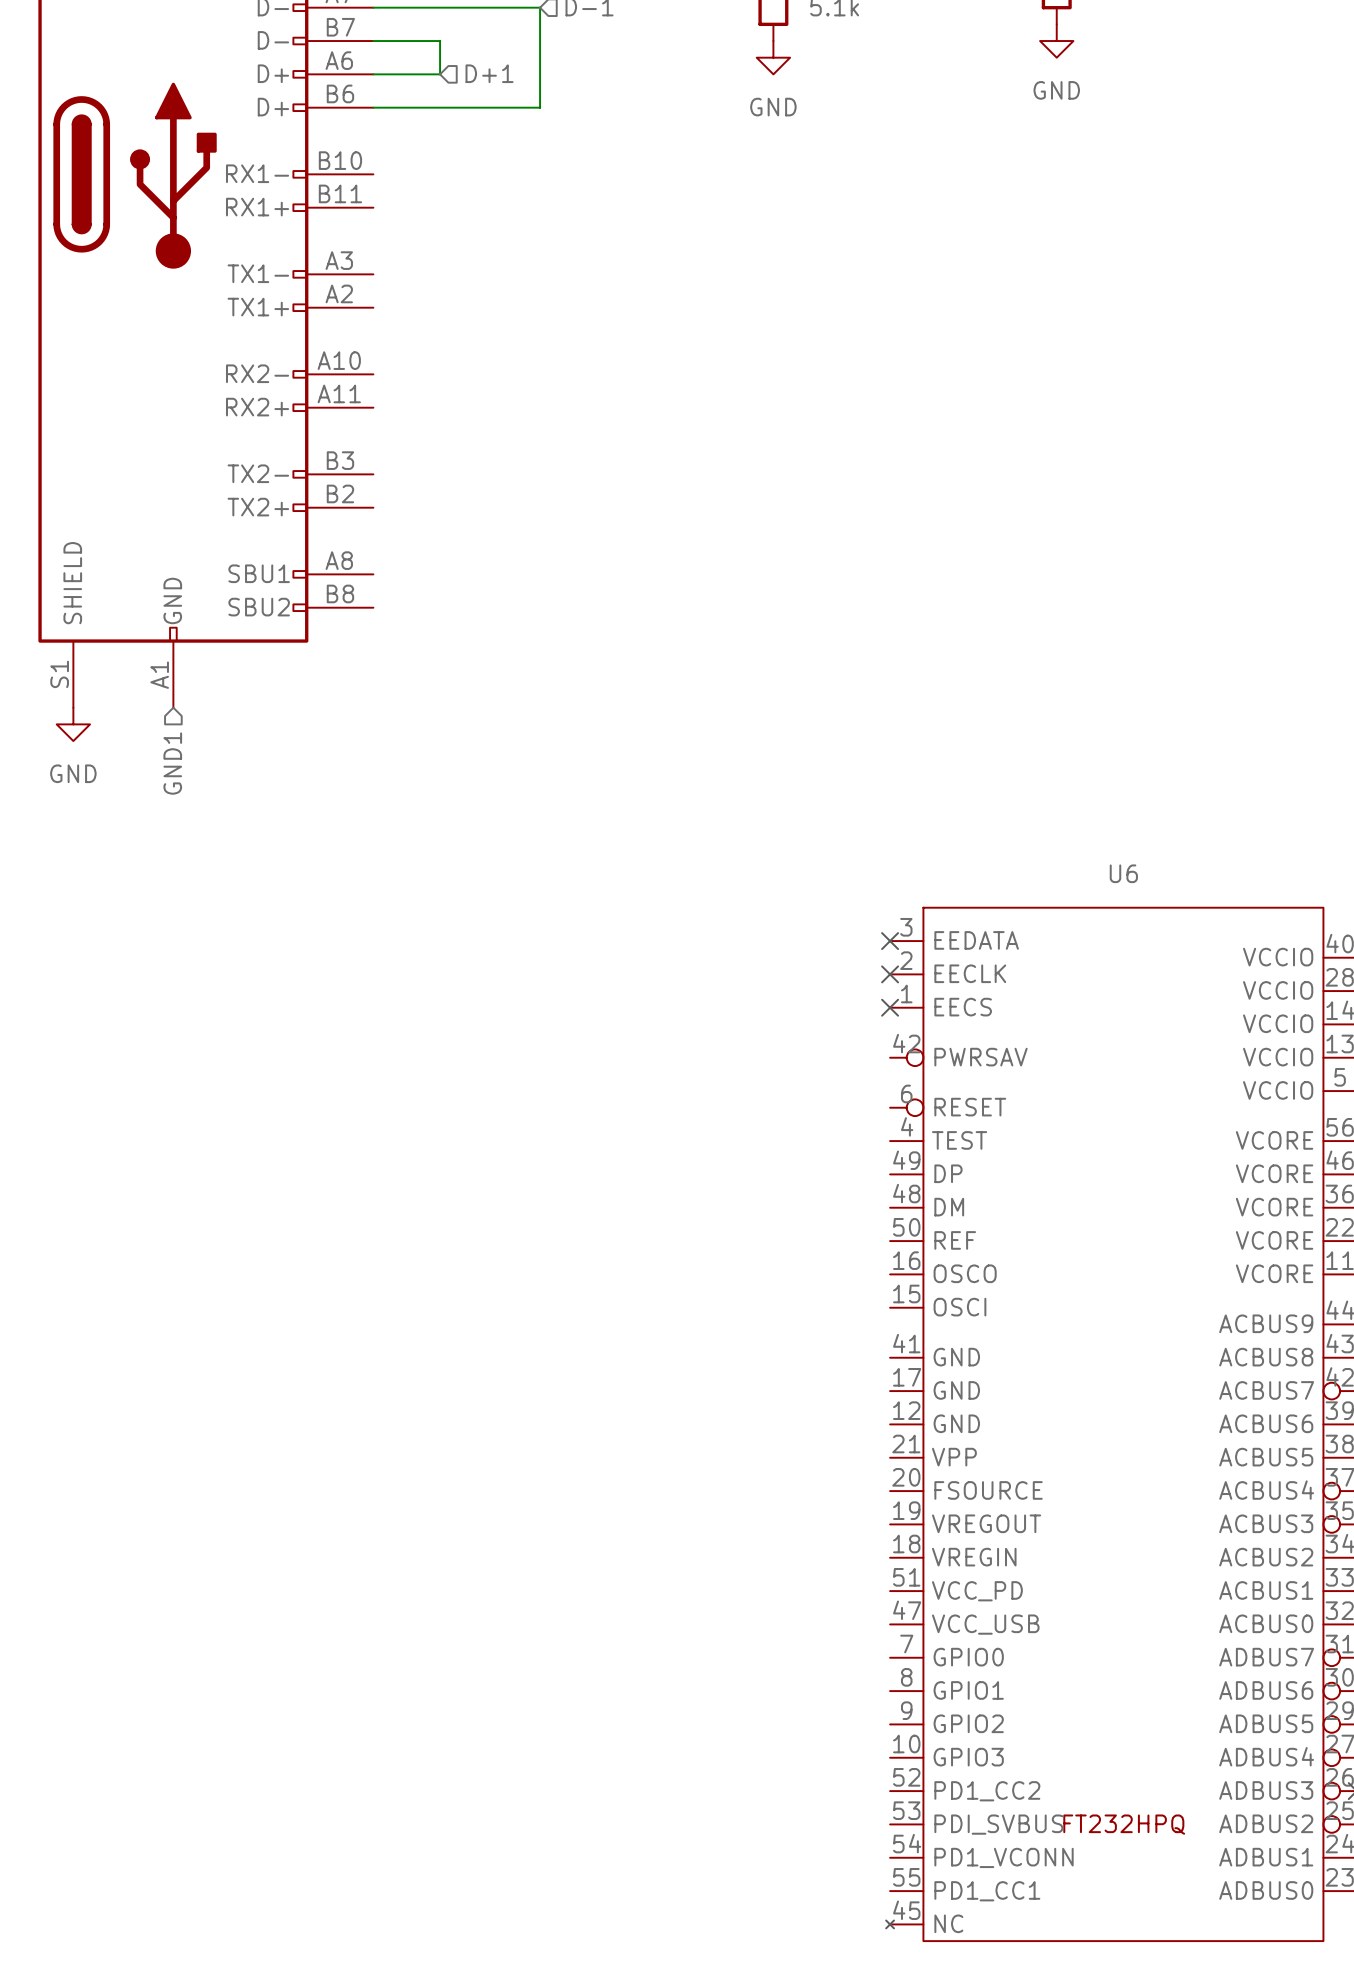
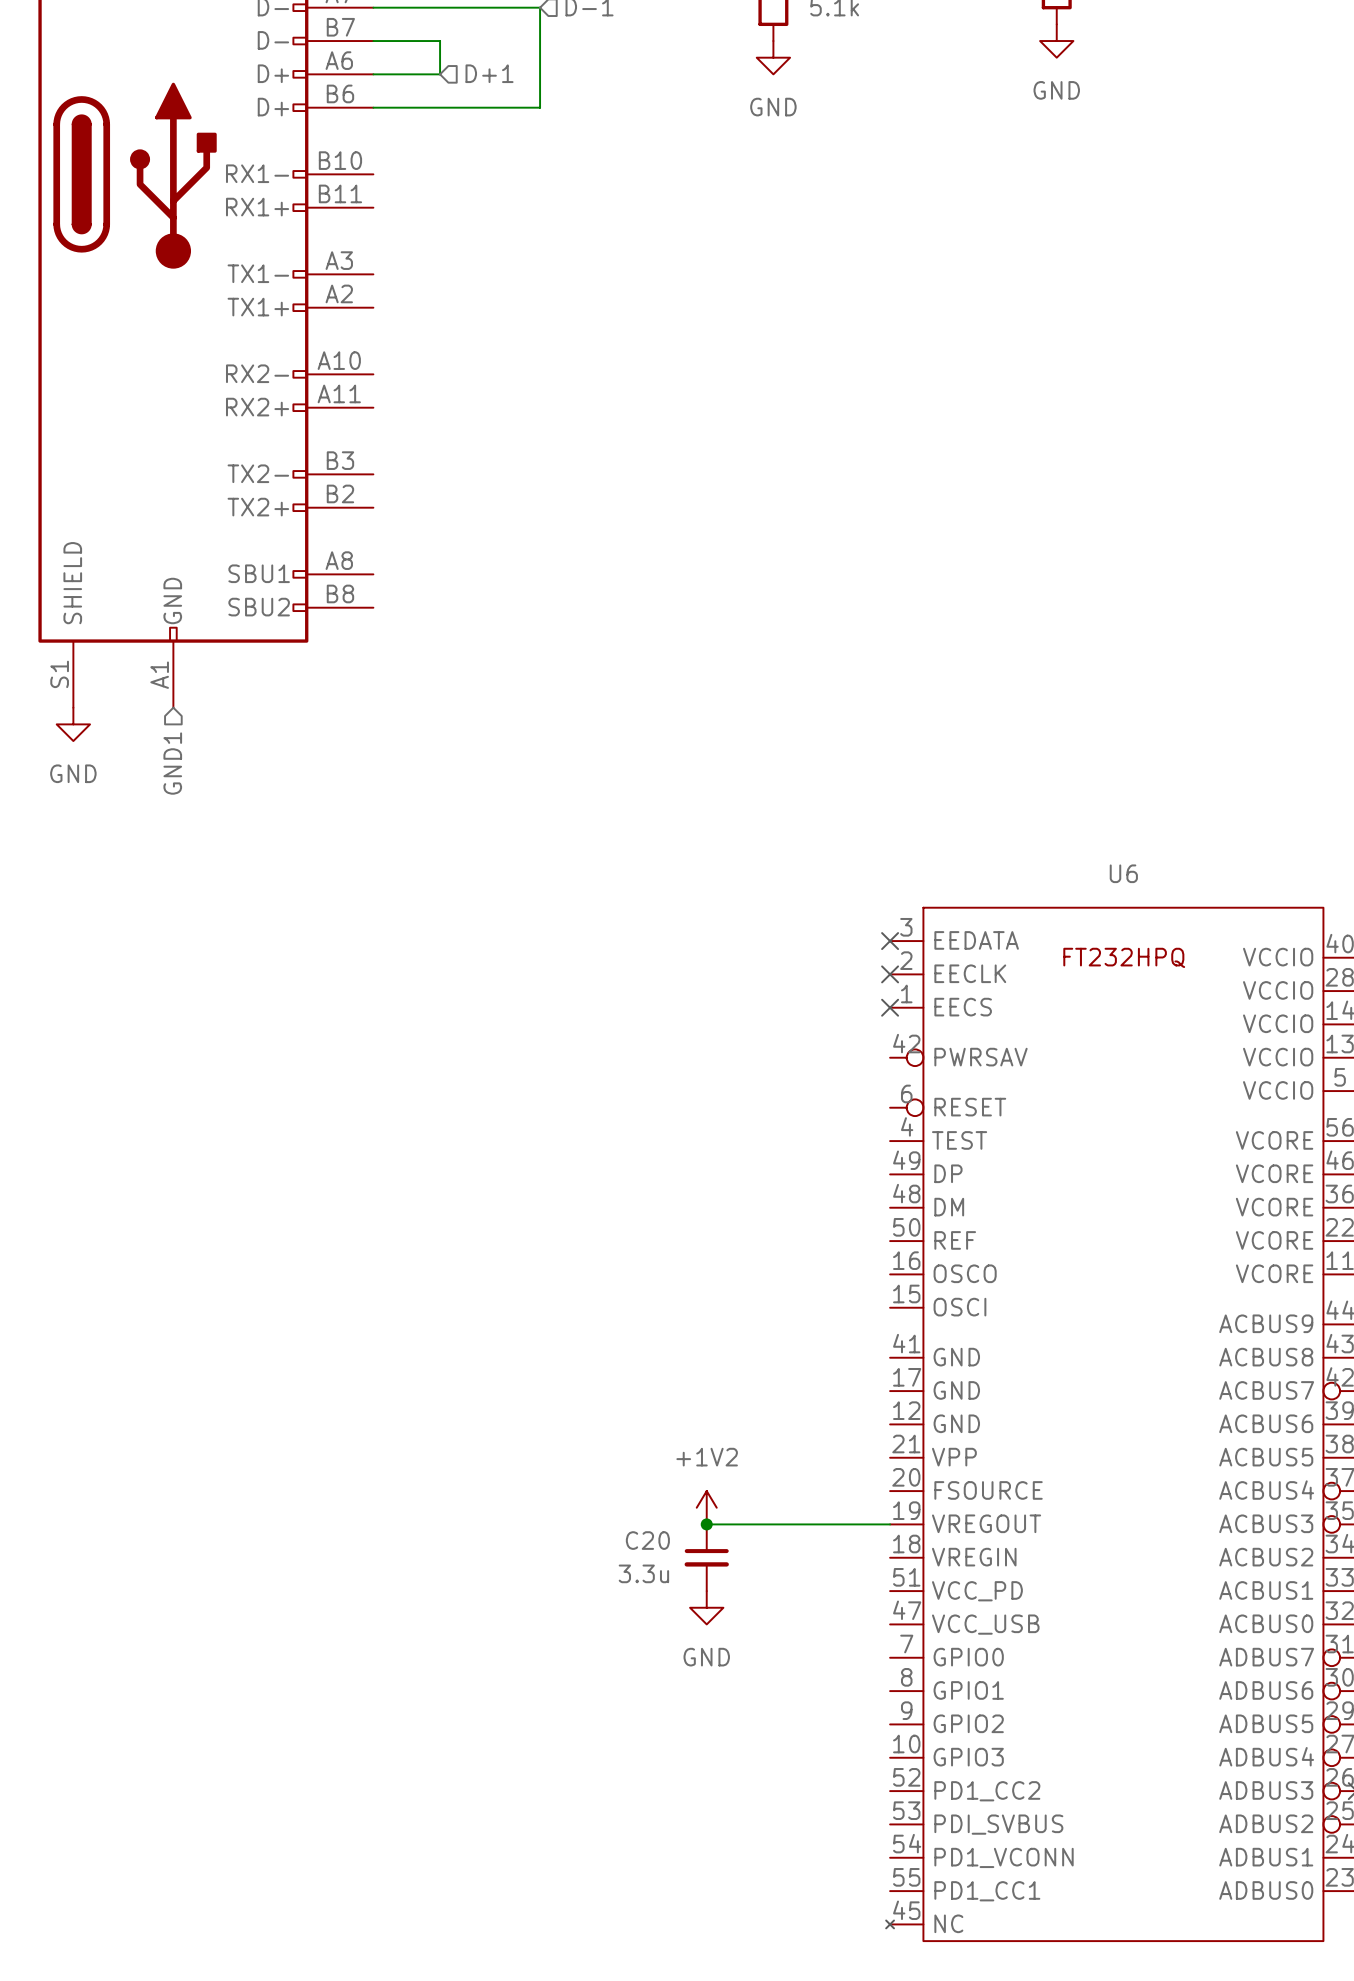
power symbol: none -> +1V2 (706, 1507)
wire: none -> (706, 1524) (890, 1524)
junction: none -> (706, 1524)
C20: none -> 3.3u (706, 1557)
power symbol: none -> GND (706, 1607)
U6 text position: FT232HPQ (1124, 1824) -> FT232HPQ (1124, 957)

